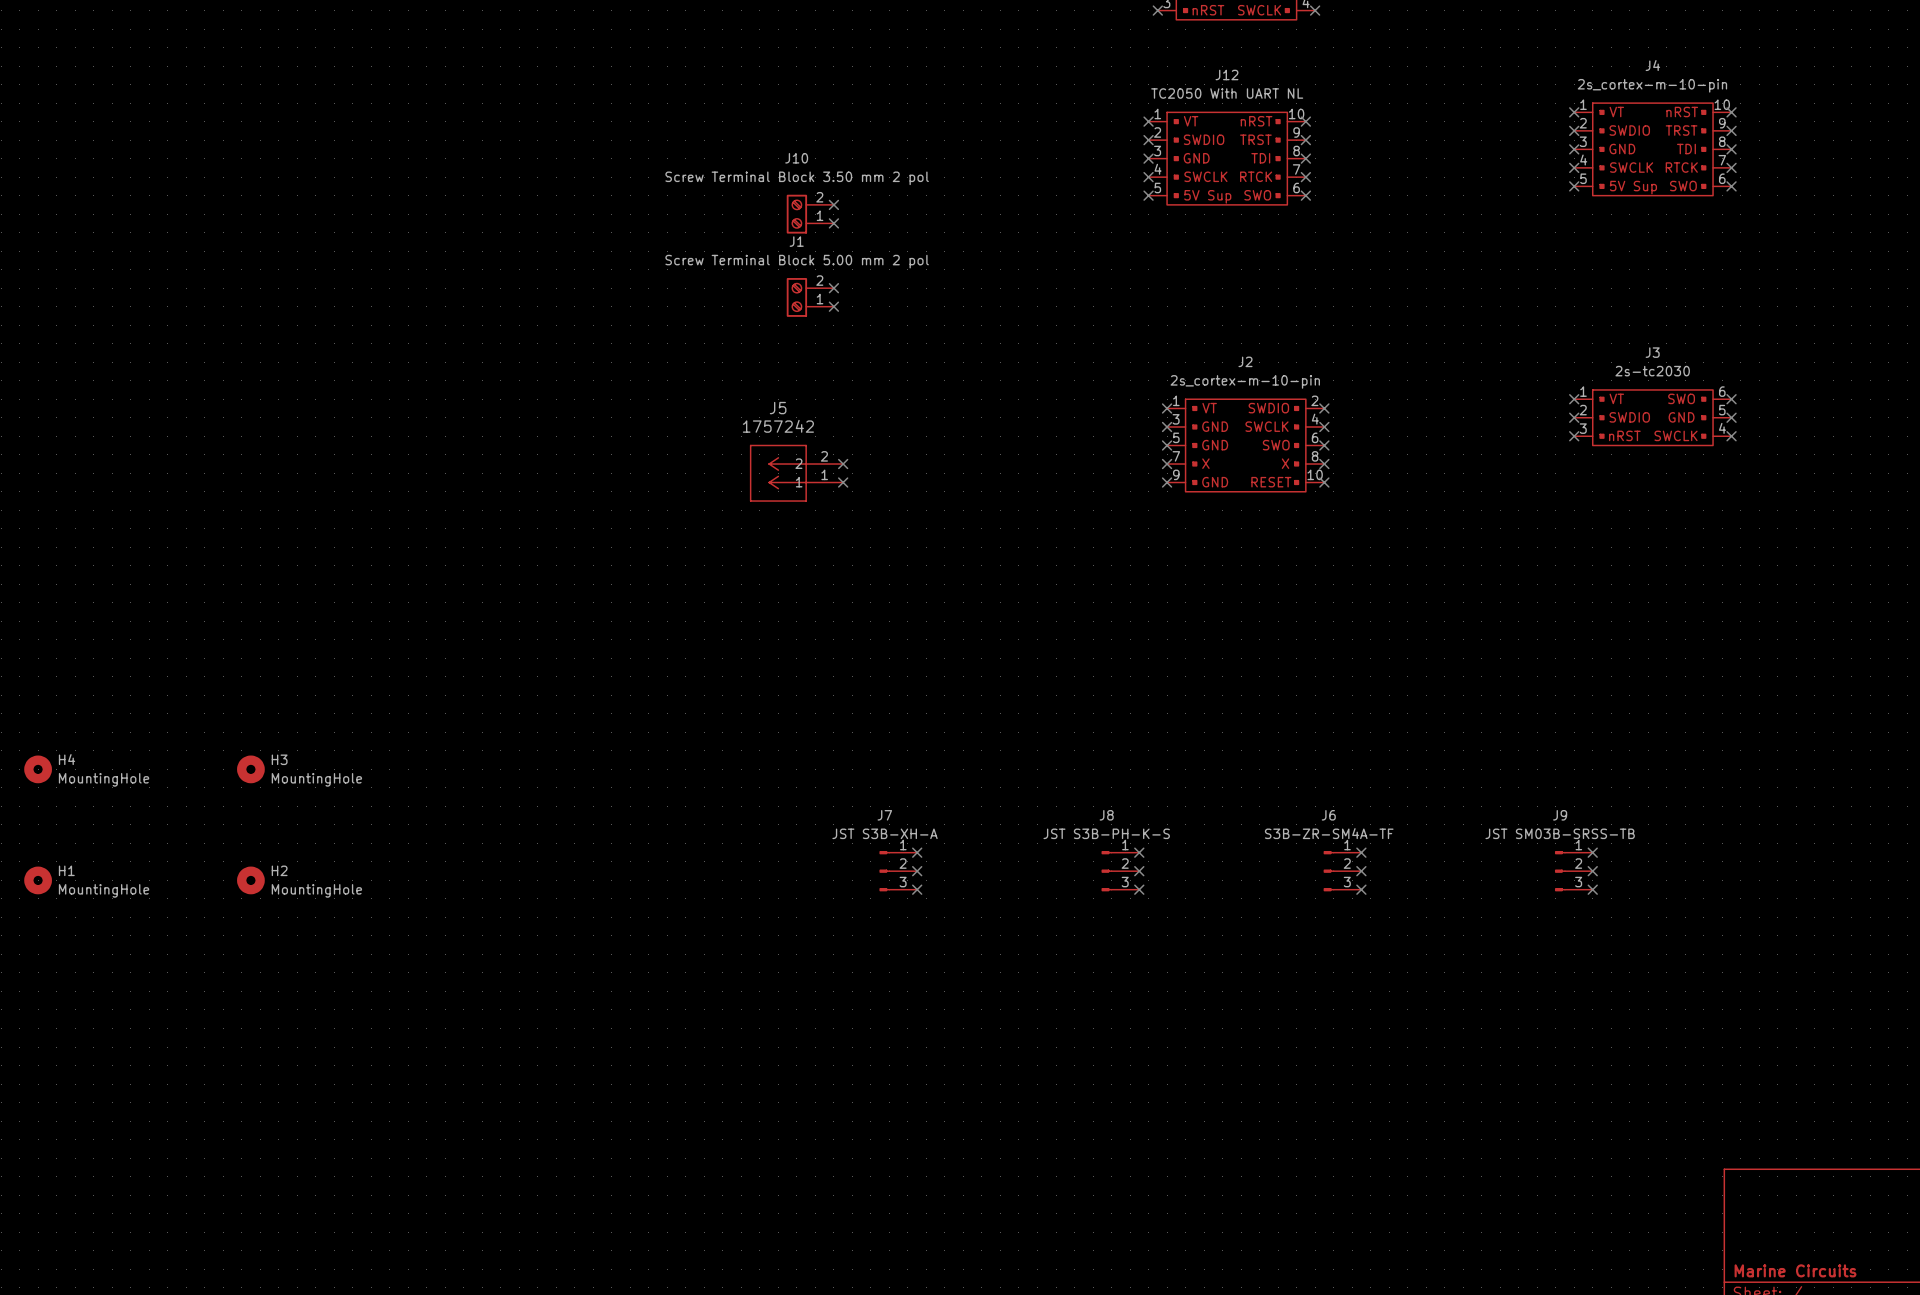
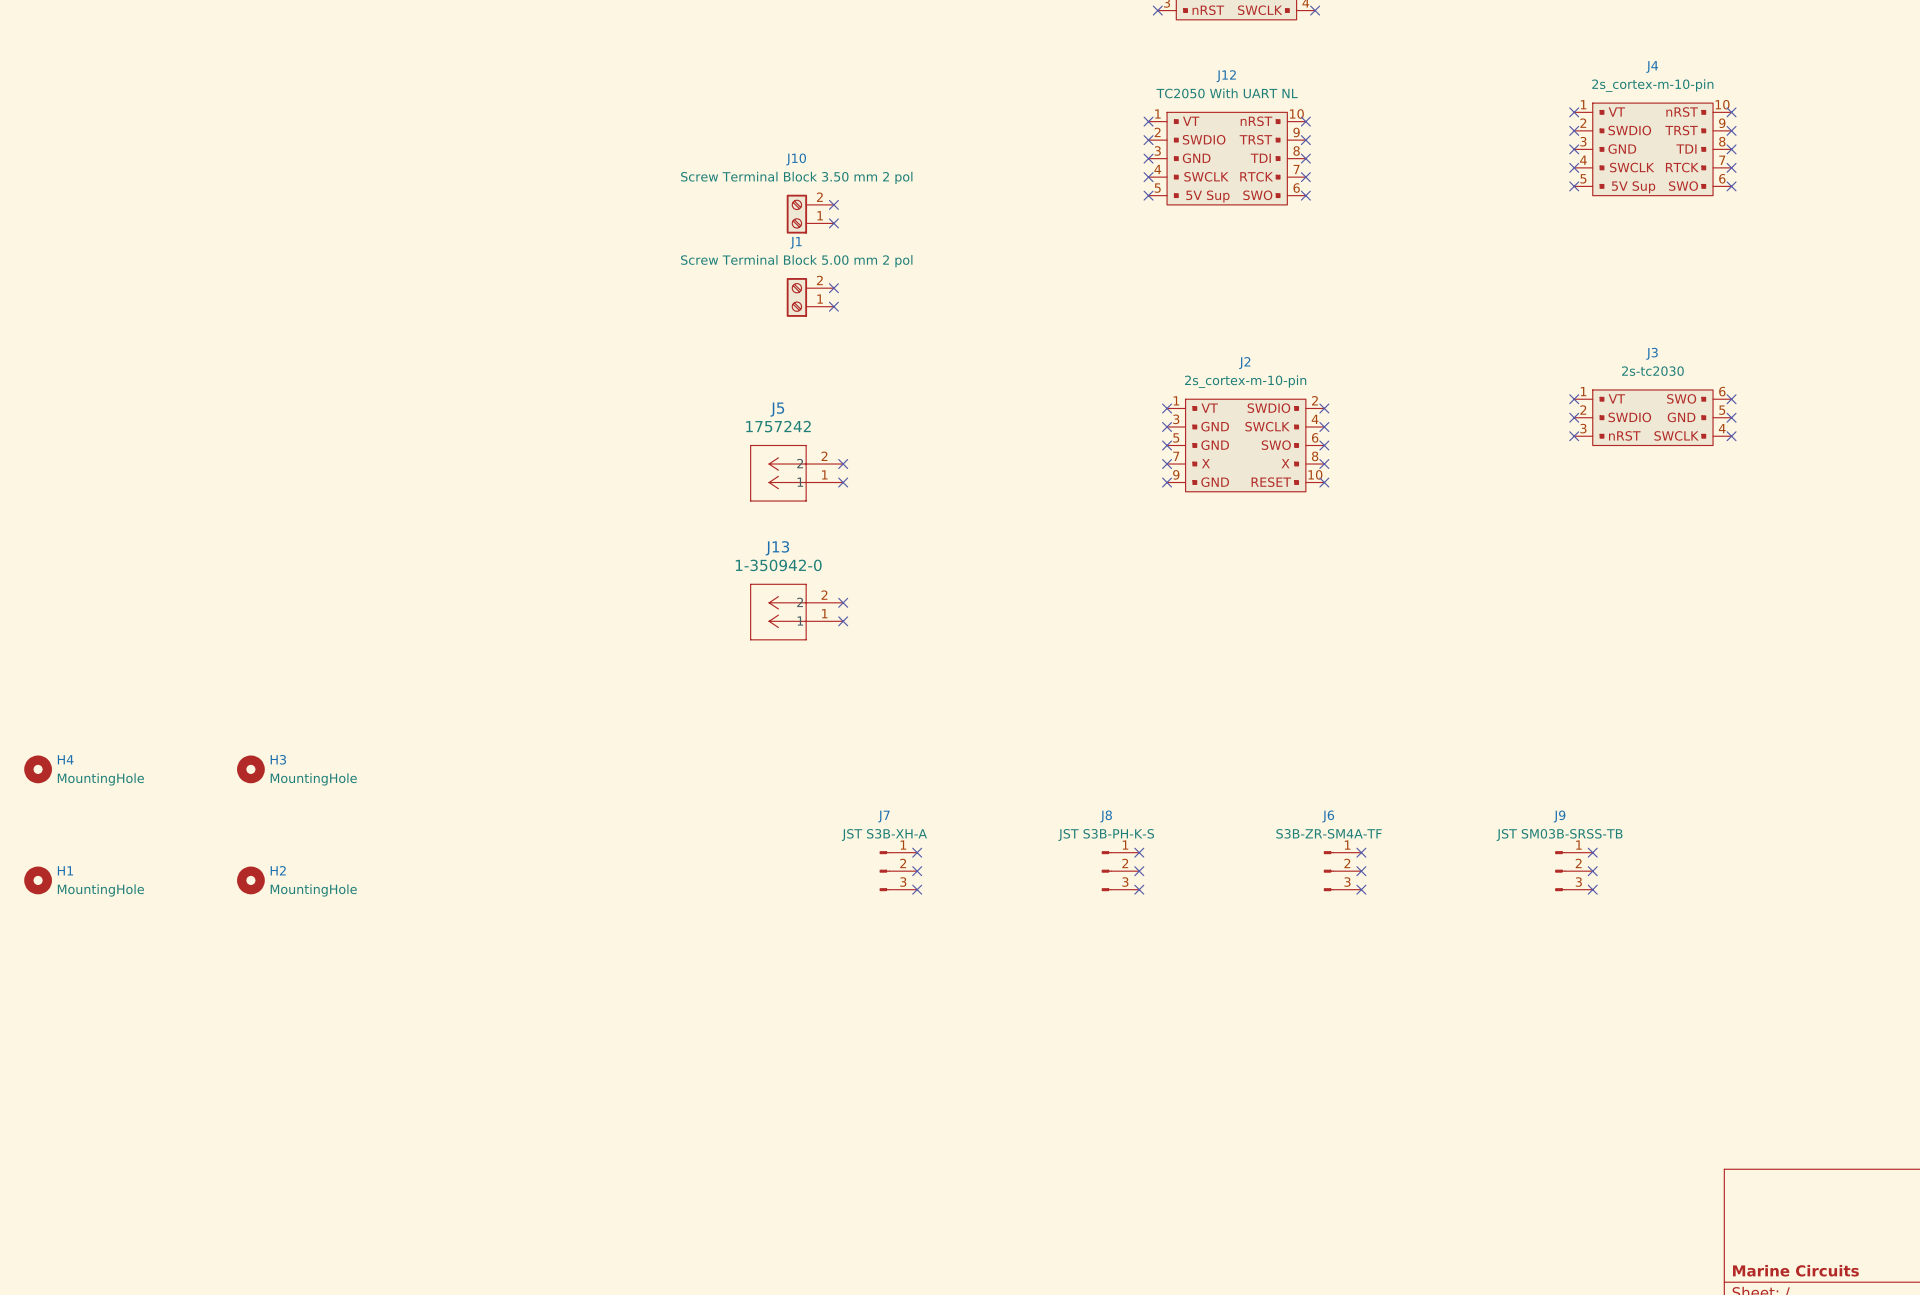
no-connect mark: none -> (843, 602)
J13: none -> 1-350942-0 (796, 612)
no-connect mark: none -> (843, 621)

